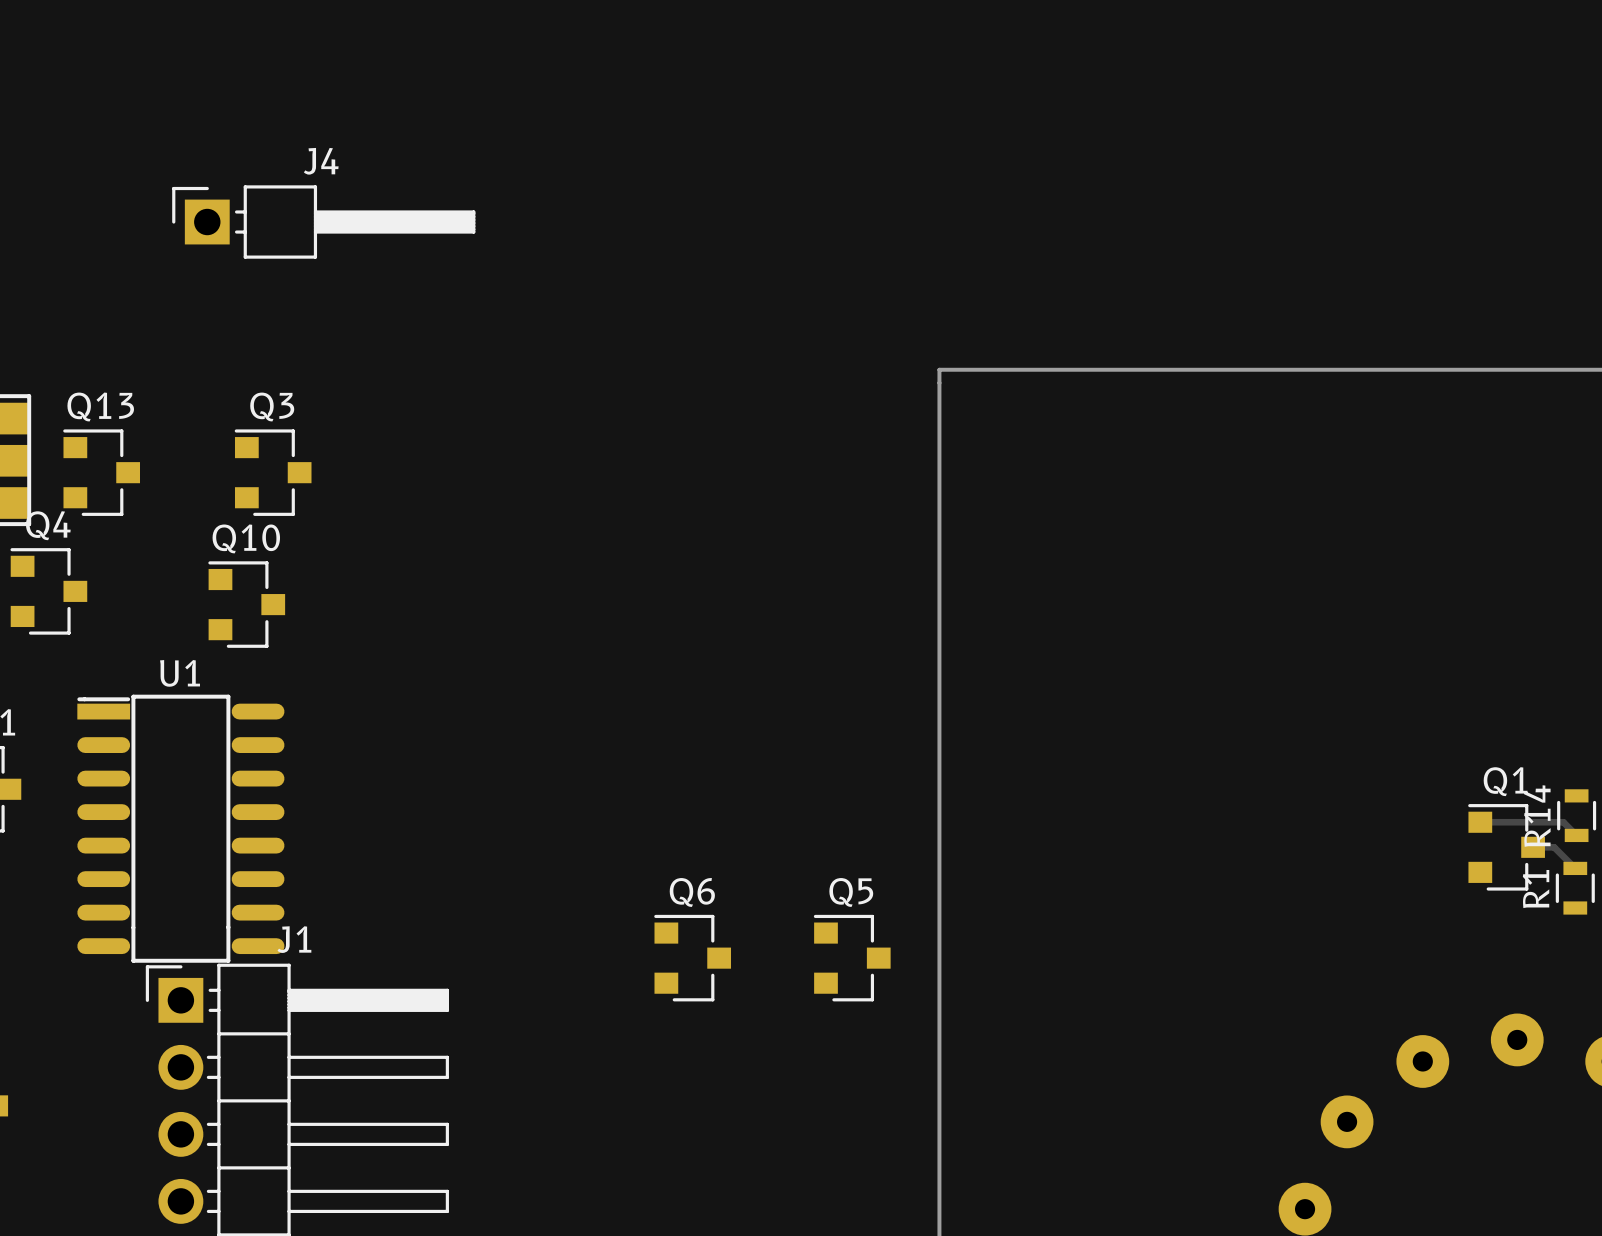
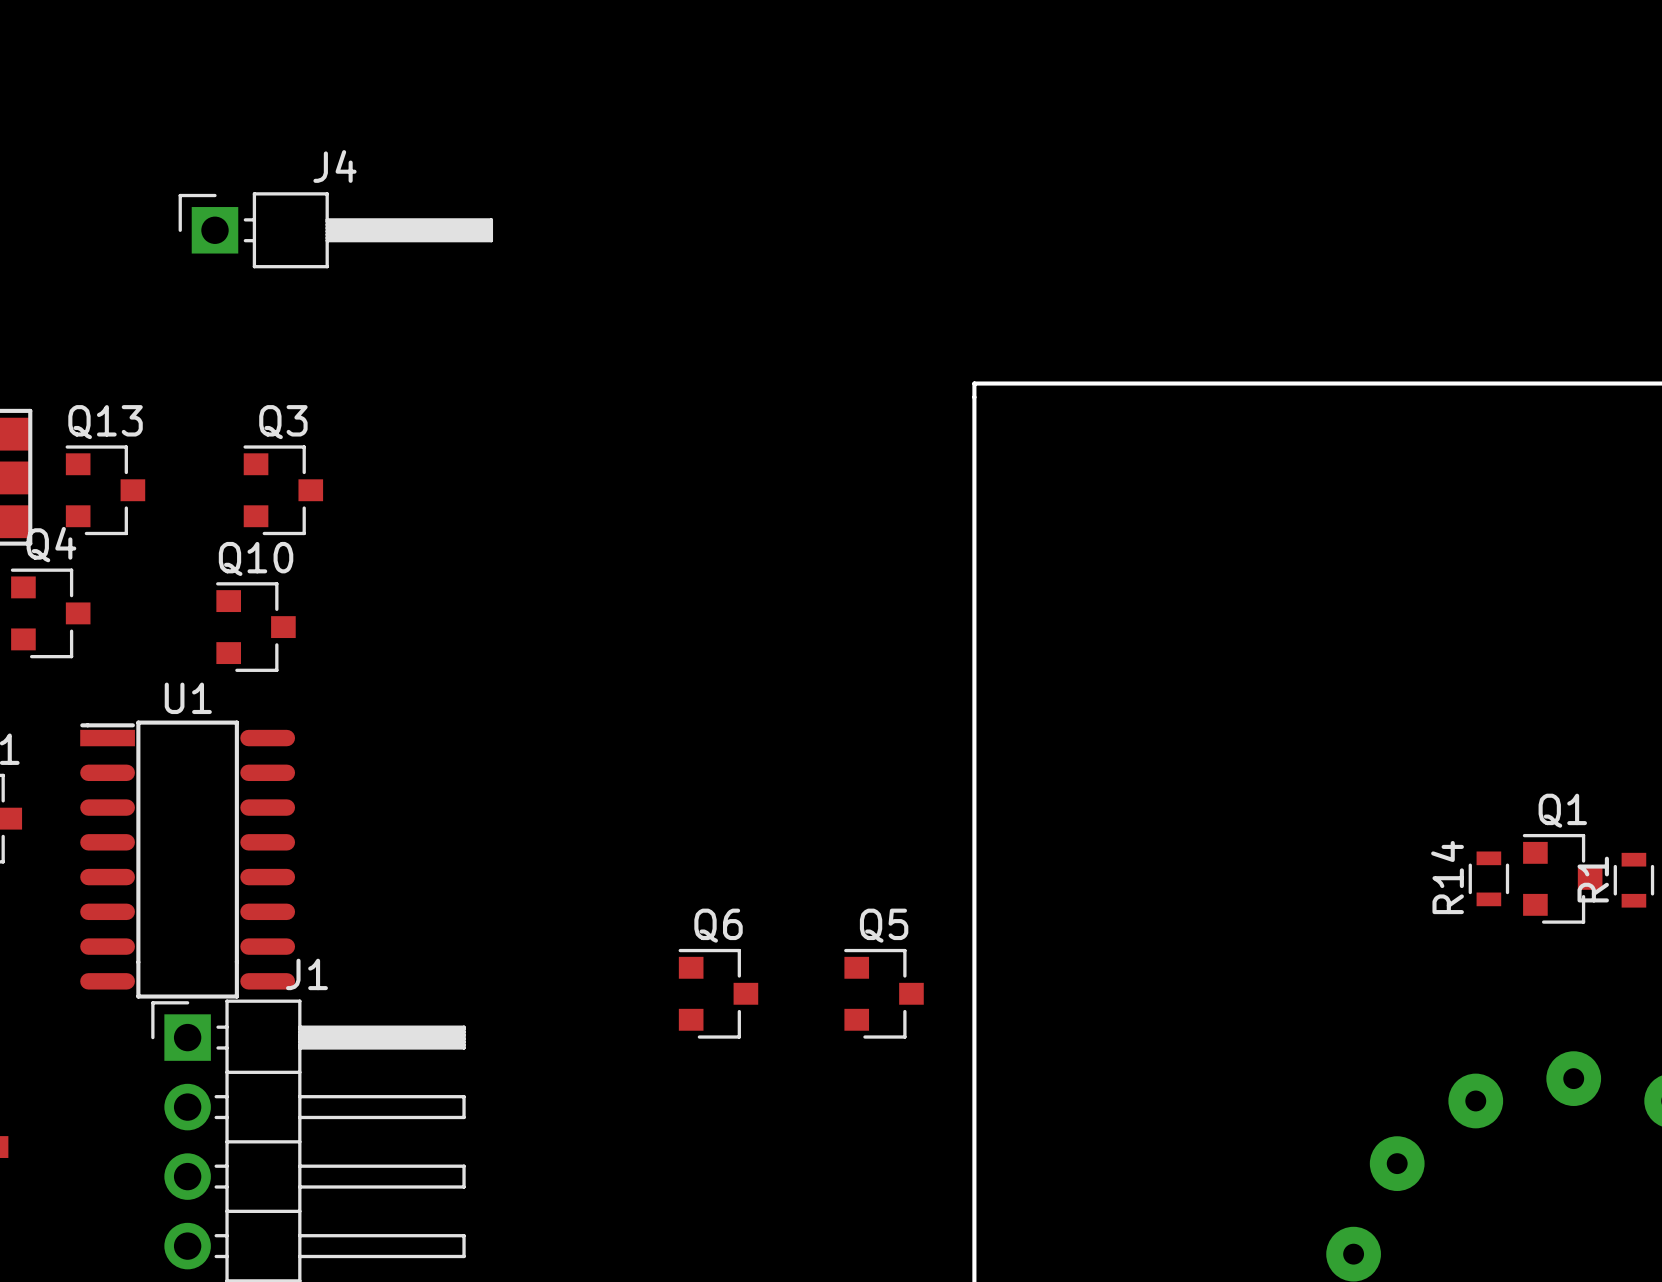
R14 position: (1576, 815) -> (1488, 878)
track: (1480, 822) (1563, 822) (1576, 835) -> none
track: (1533, 847) (1554, 847) (1575, 868) -> none
R1 position: (1575, 888) -> (1633, 880)

